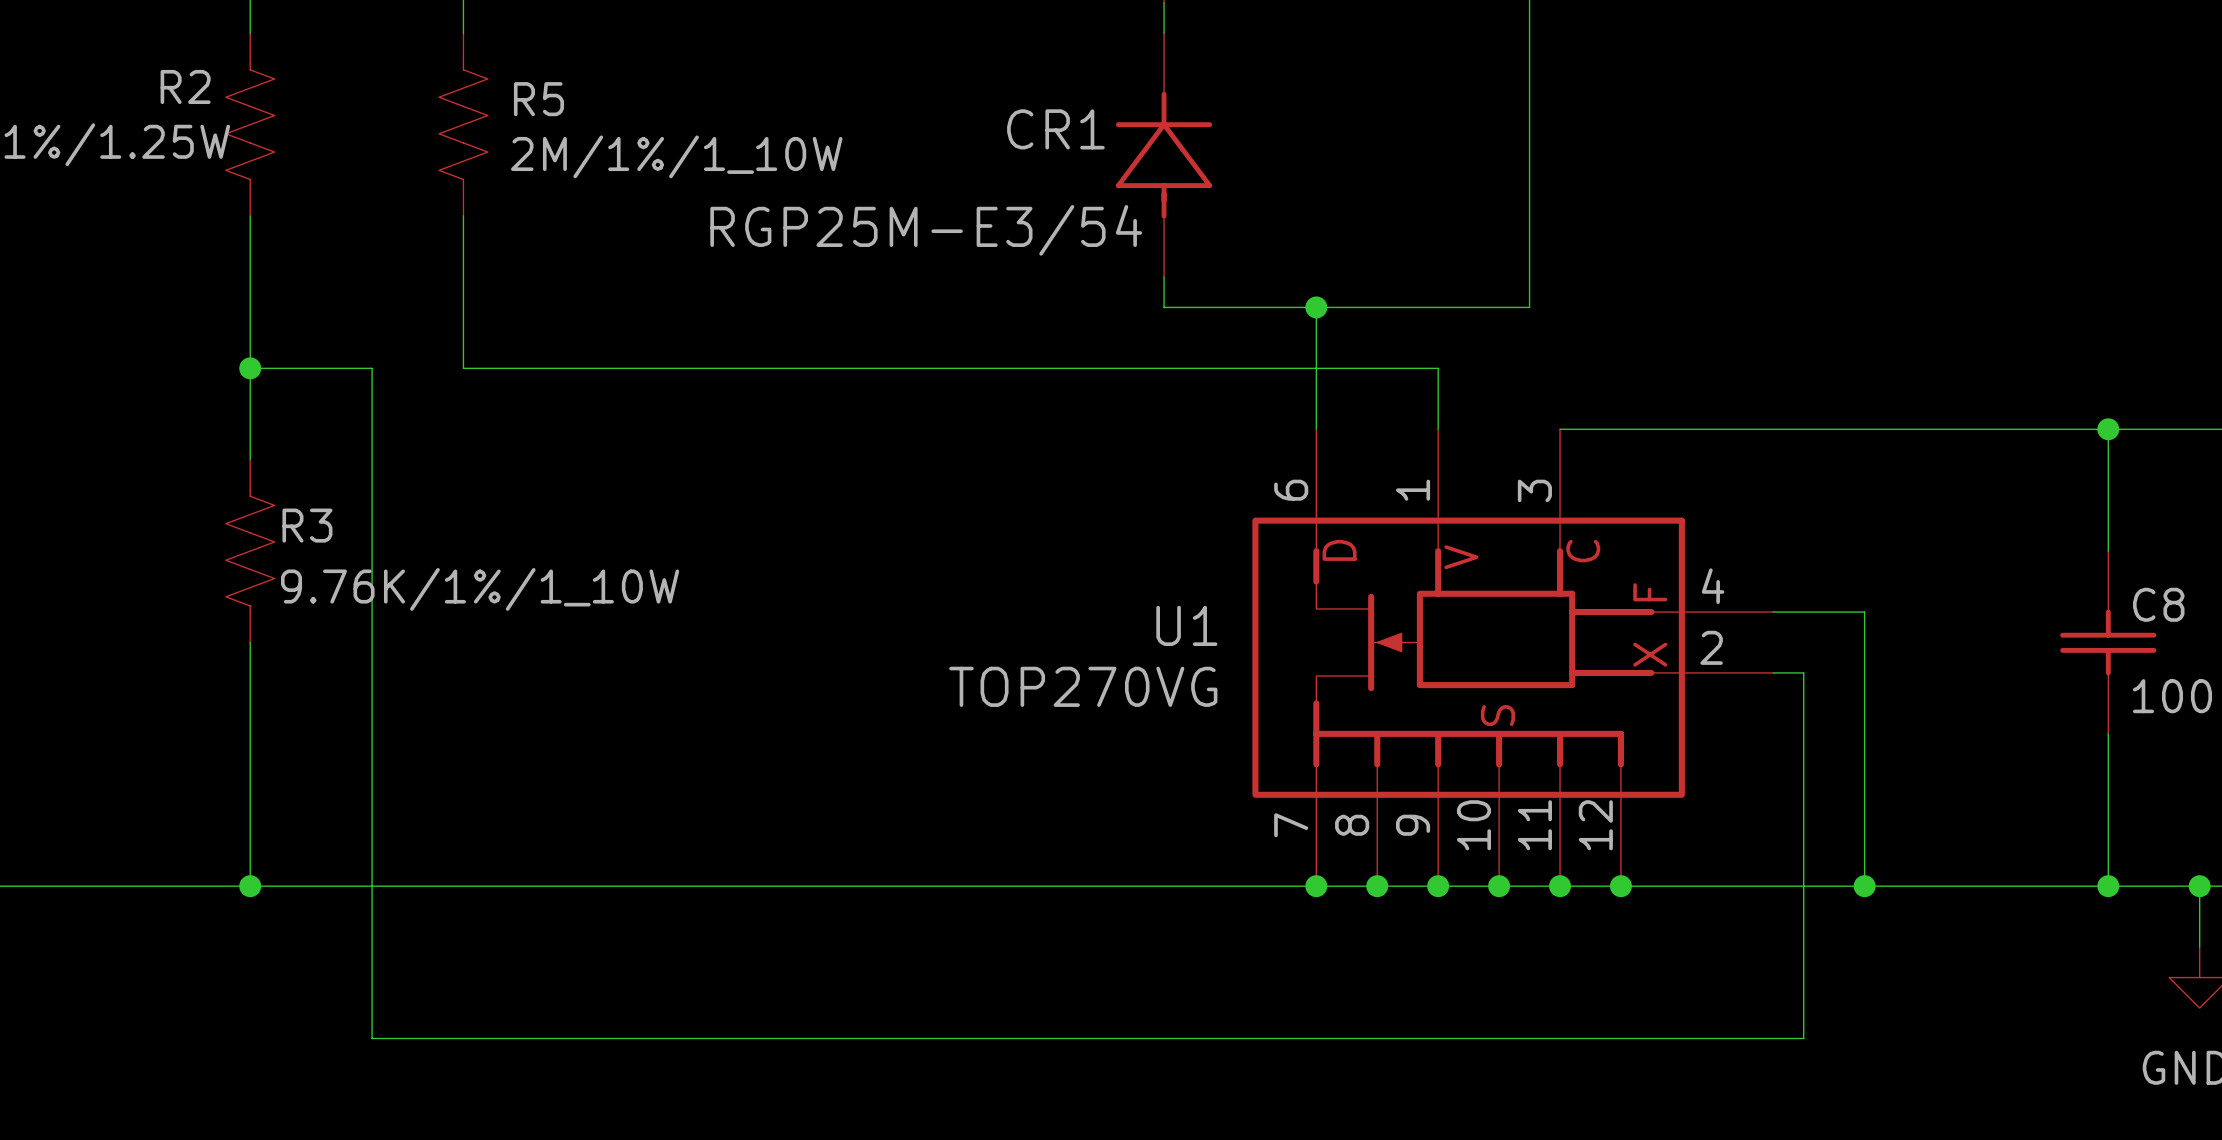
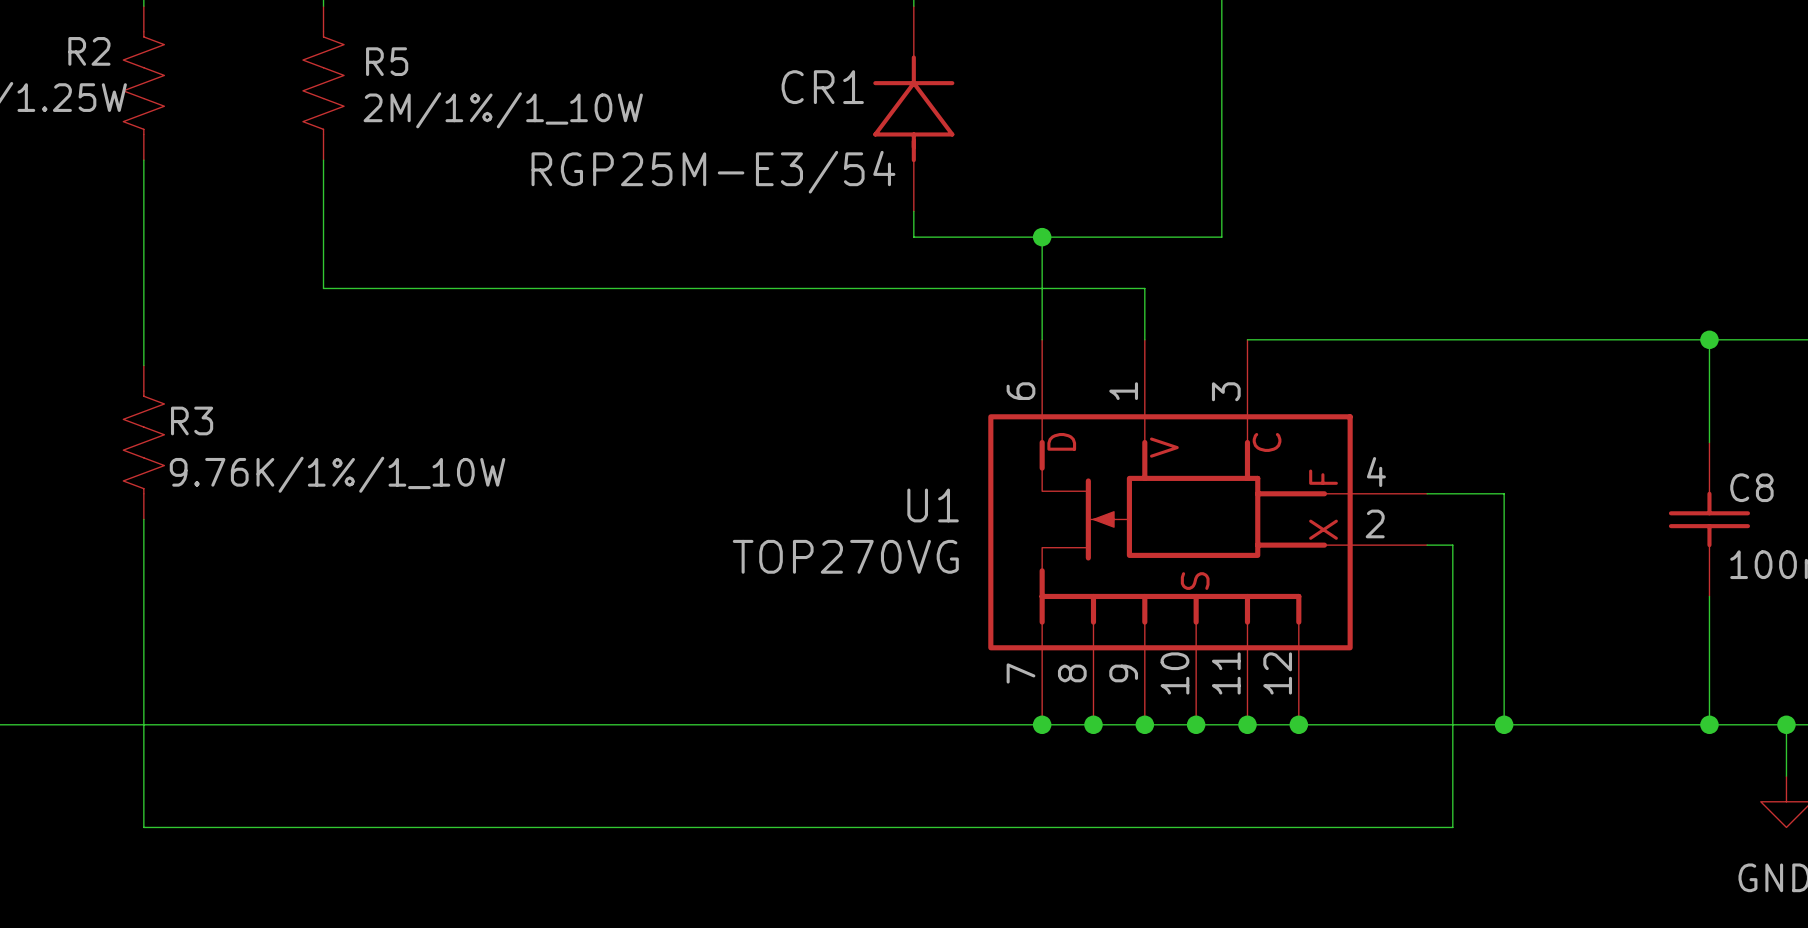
wire: (250, 368) (372, 368) (372, 1038) (1803, 1038) (1803, 1008) -> (143, 724) (143, 827) (1452, 827)
junction: (250, 368) -> none
junction: (250, 886) -> none

